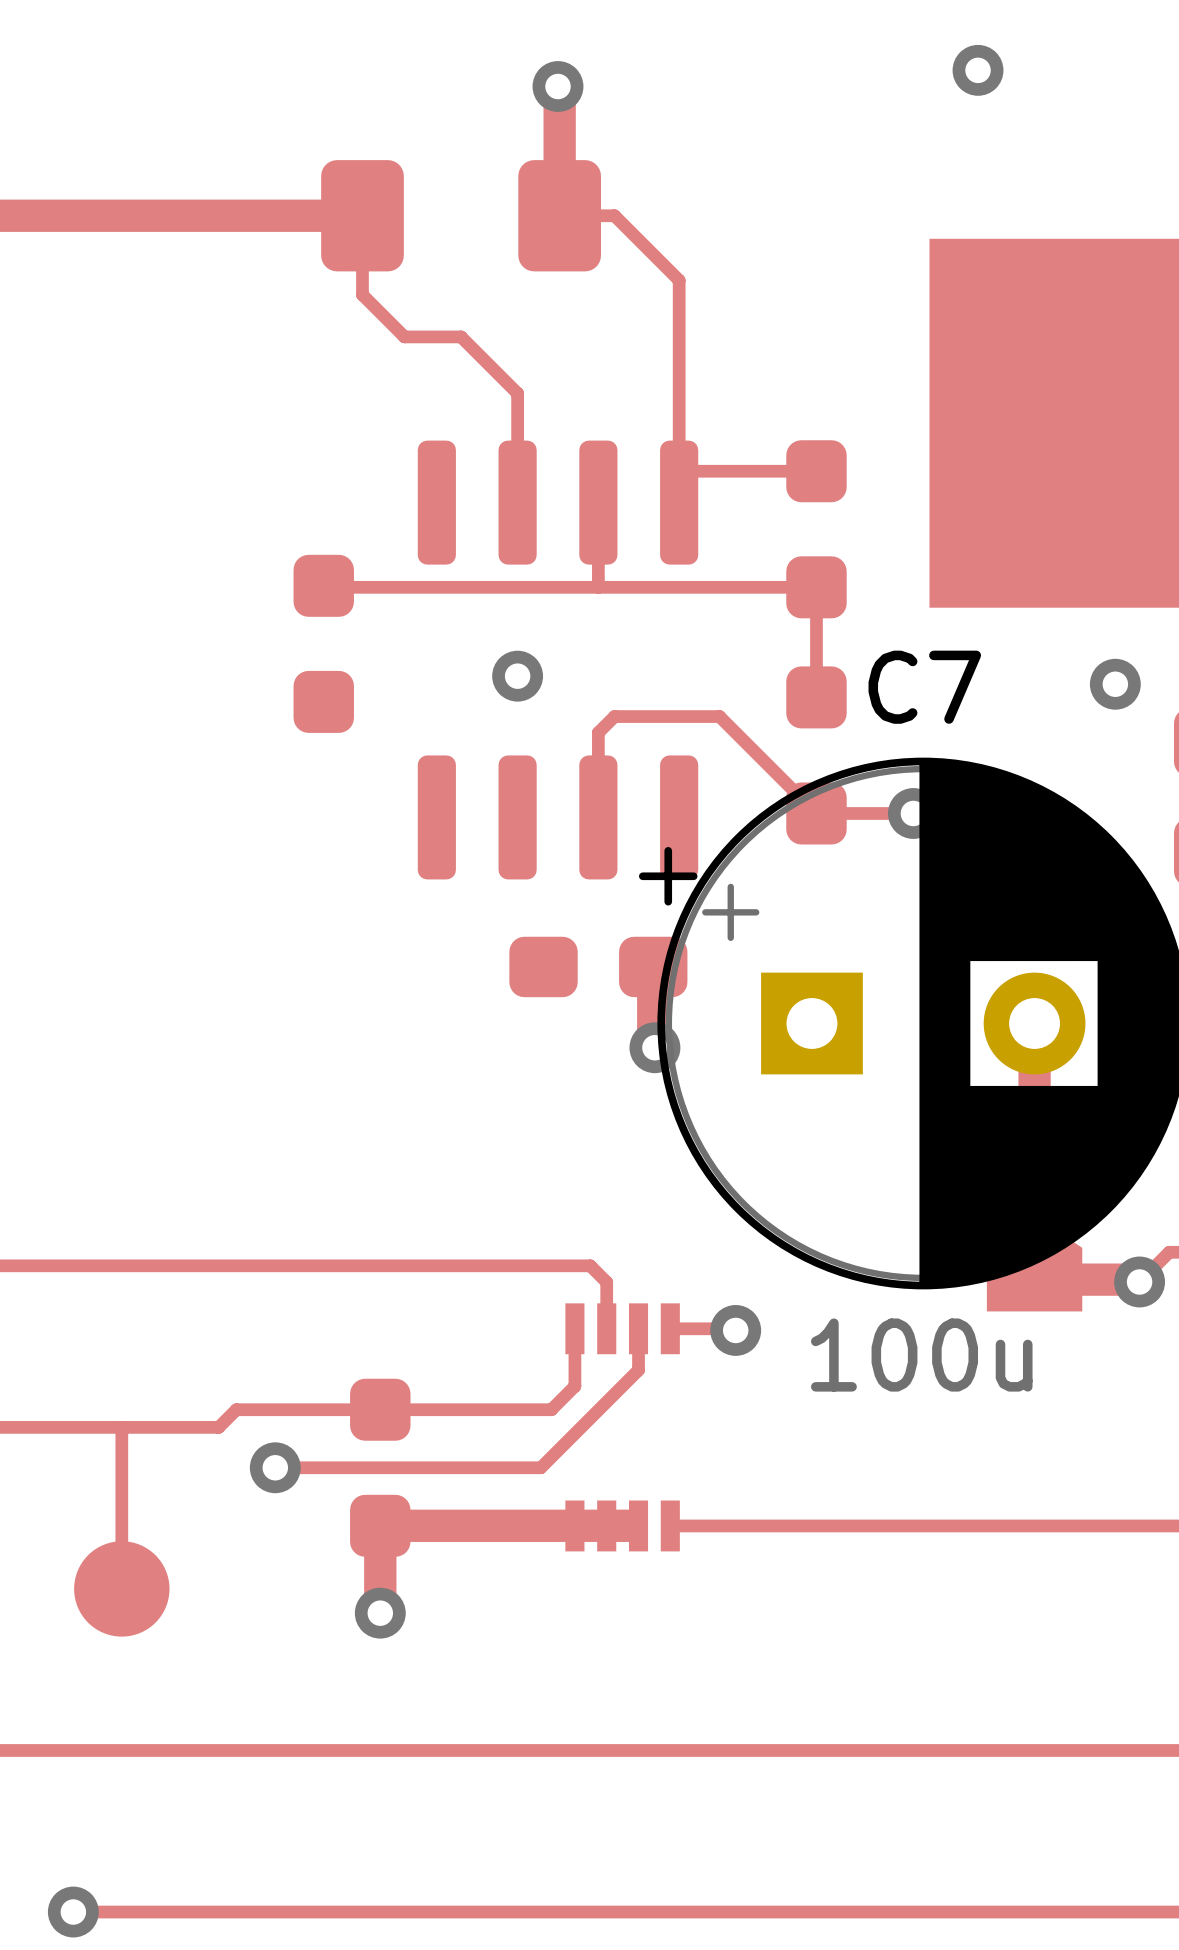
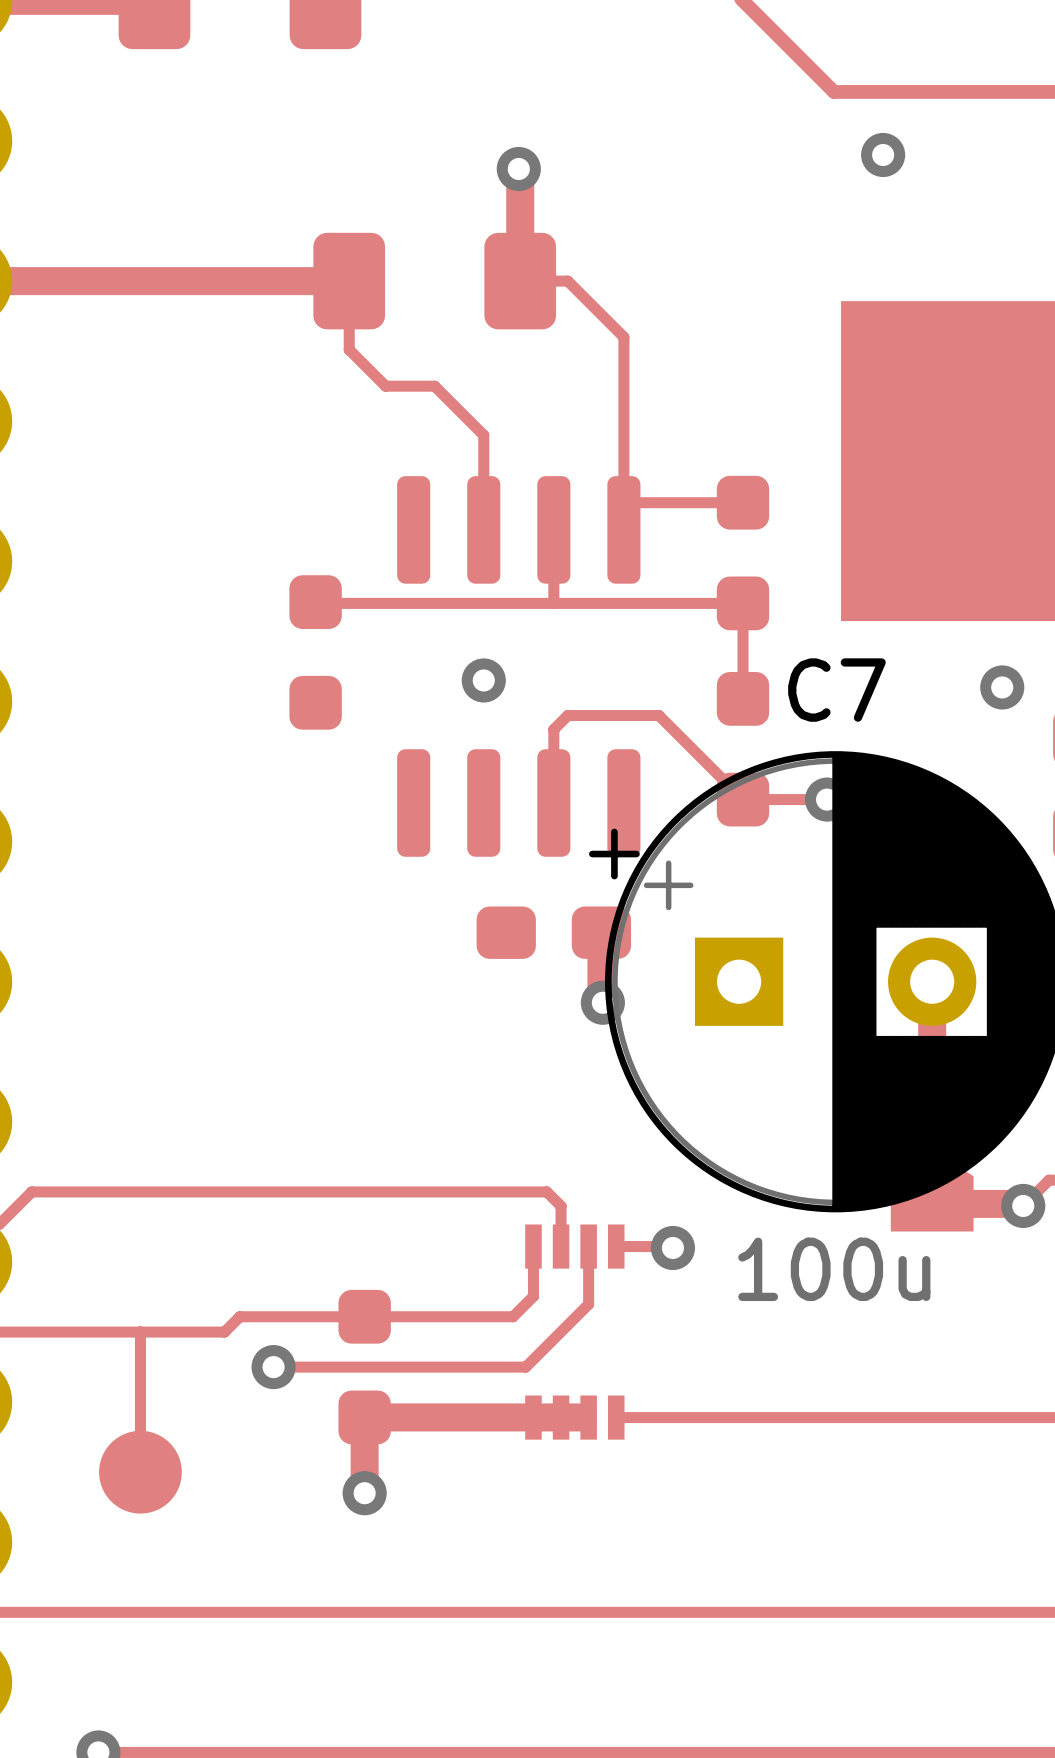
top track: (638, 1370) (540, 1467) -> (588, 1282) (588, 1304) (525, 1367) (503, 1367)

